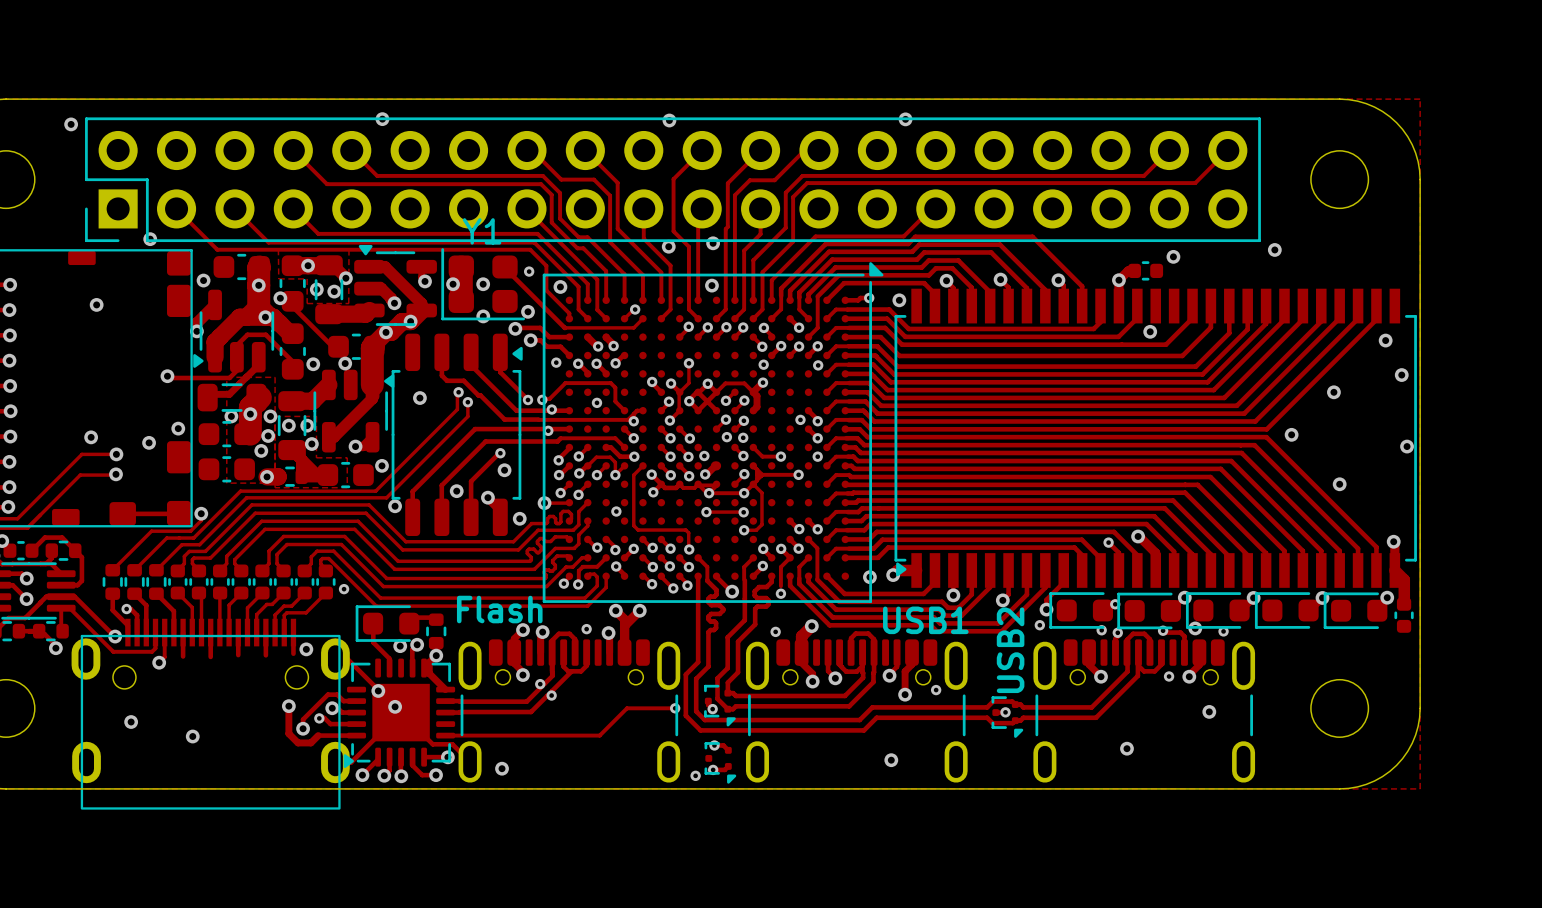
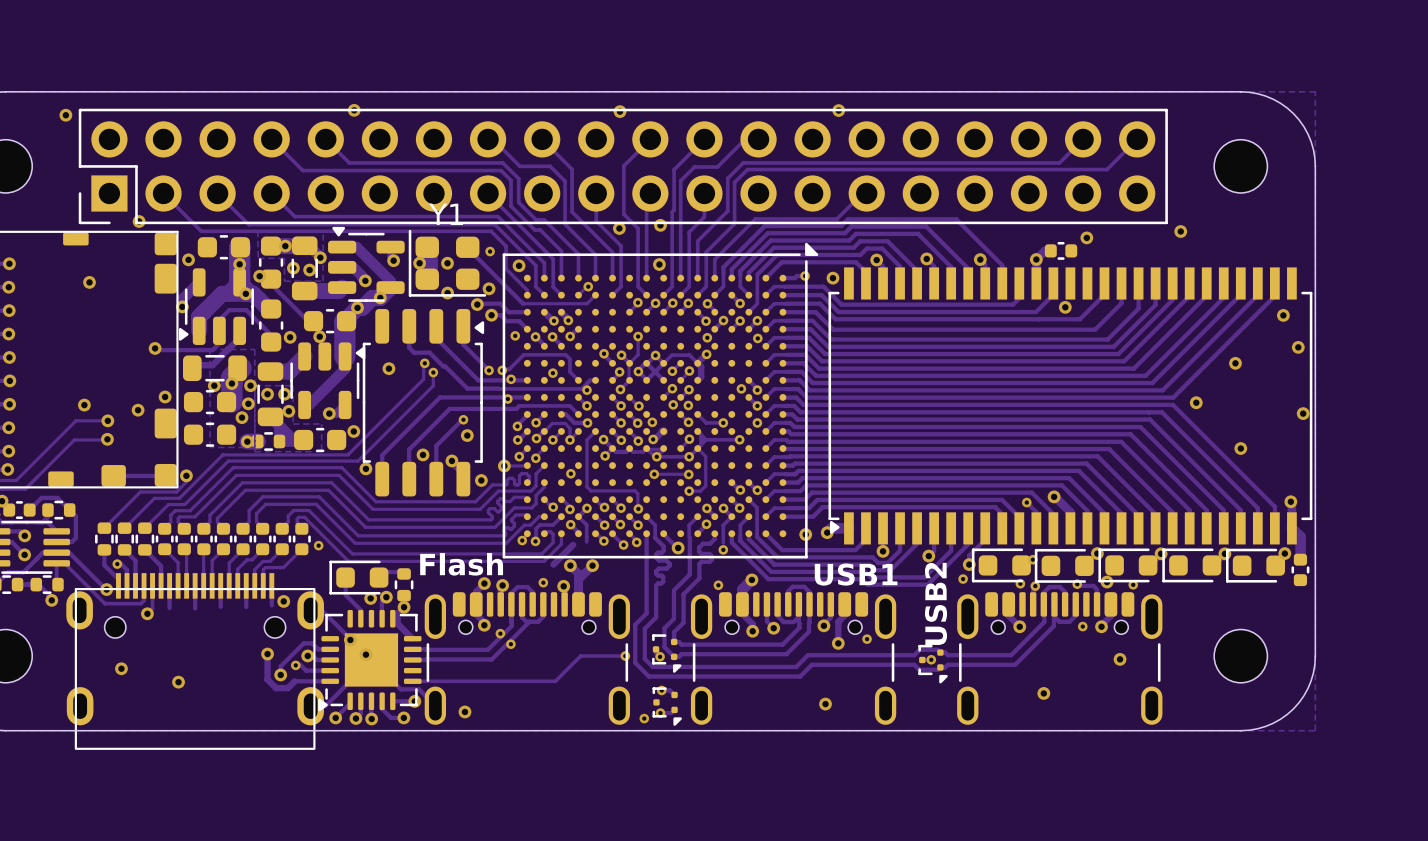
track: none -> (578, 516) (586, 524) (586, 541)
track: none -> (573, 544) (553, 564)

